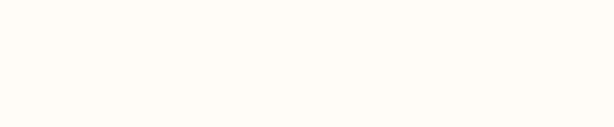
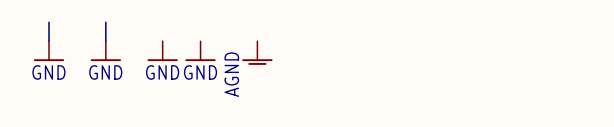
wire: none -> (49, 22) (49, 41)
wire: none -> (105, 22) (105, 41)
power symbol: none -> GND (49, 51)
power symbol: none -> GND (105, 51)
power symbol: none -> GND (162, 51)
power symbol: none -> GND (200, 51)
power symbol: none -> AGND (257, 53)

